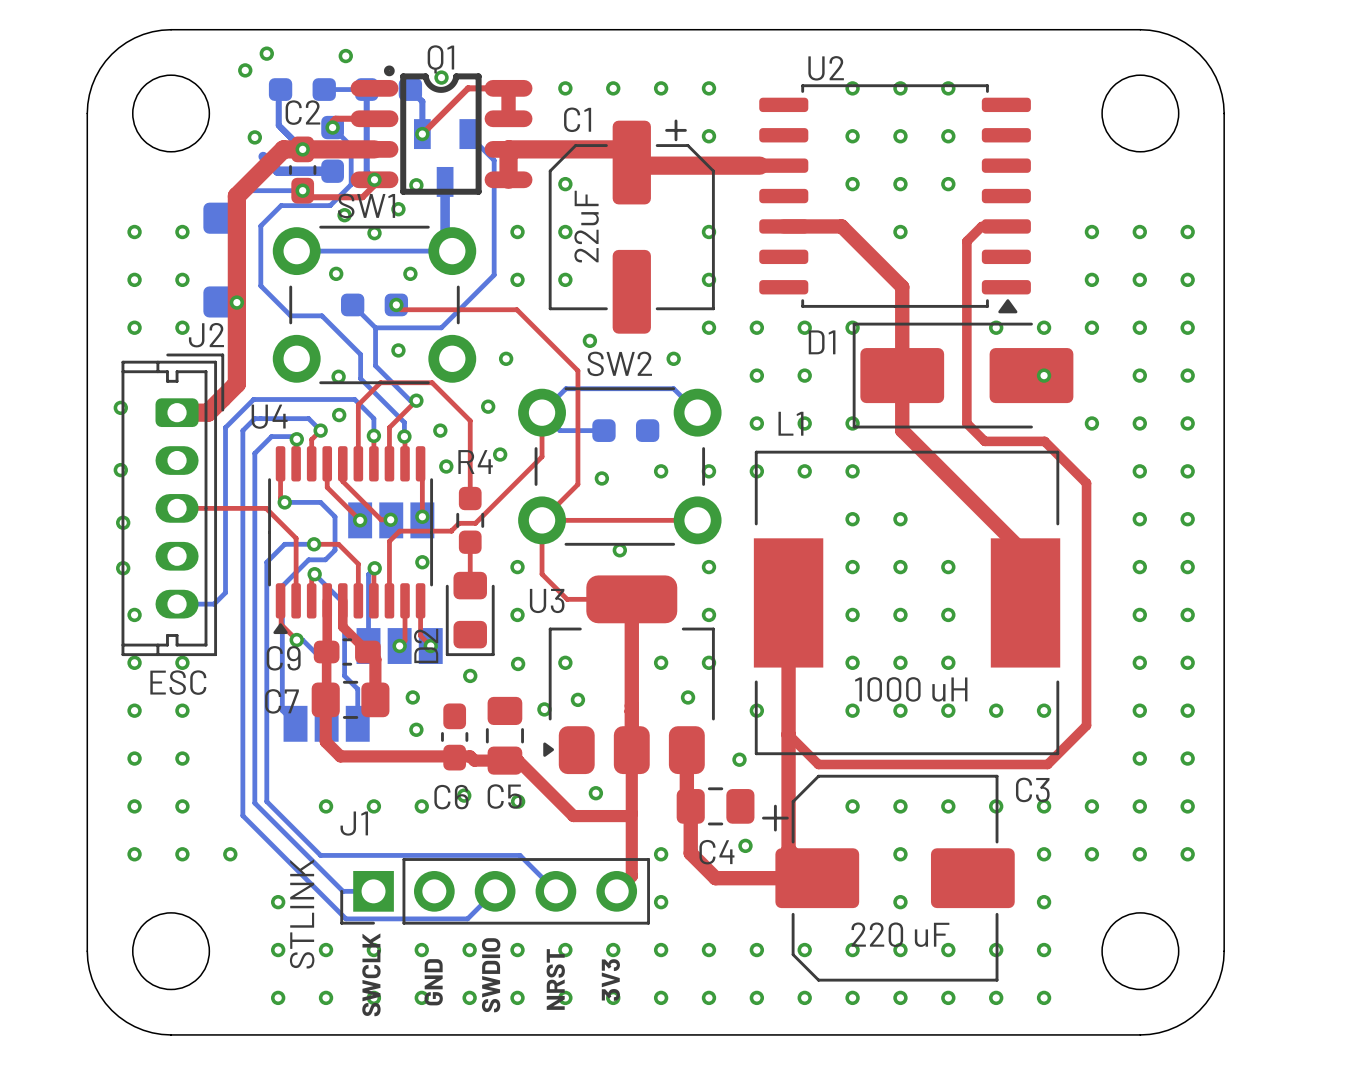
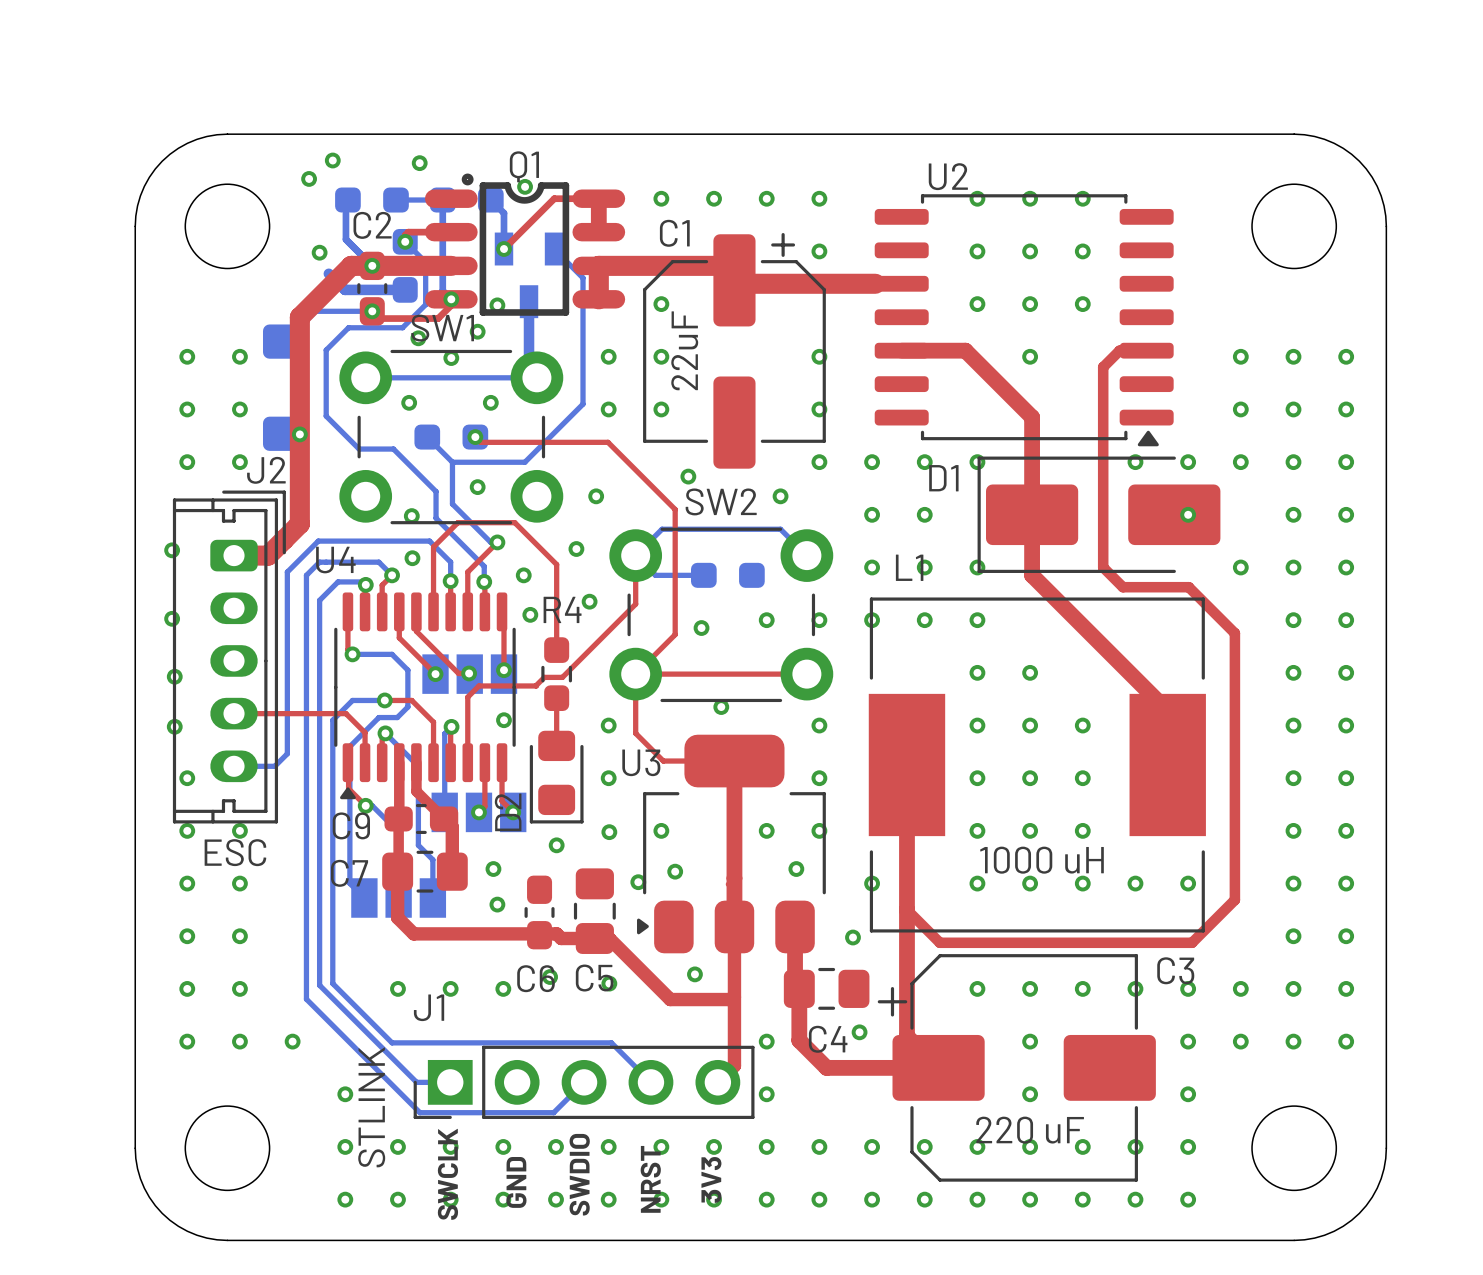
top track: (189, 508) (266, 508) (296, 538) (296, 573) -> (234, 713) (345, 713) (365, 732)

